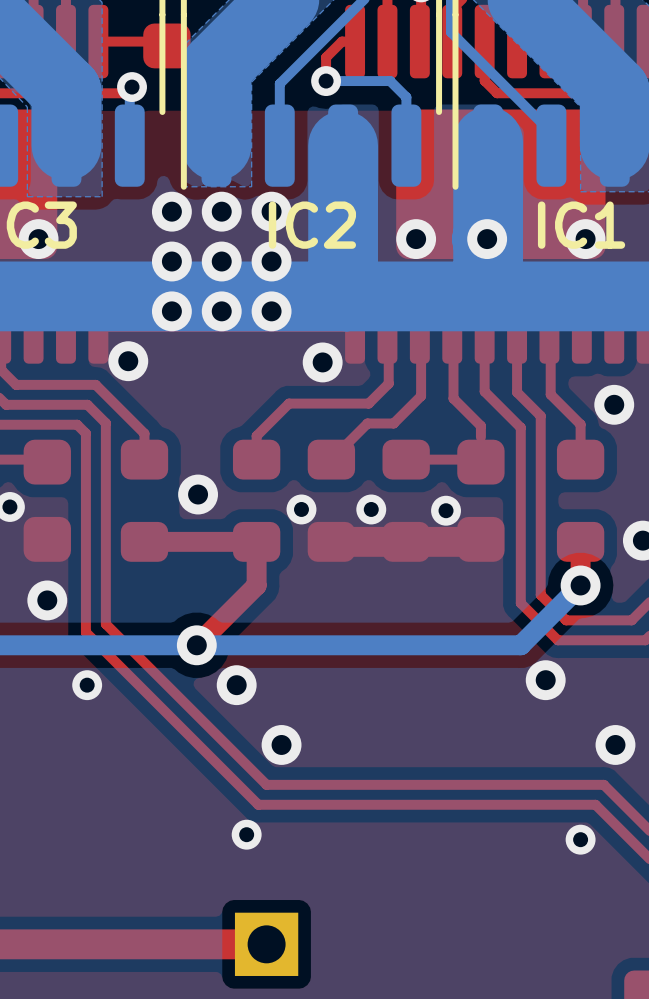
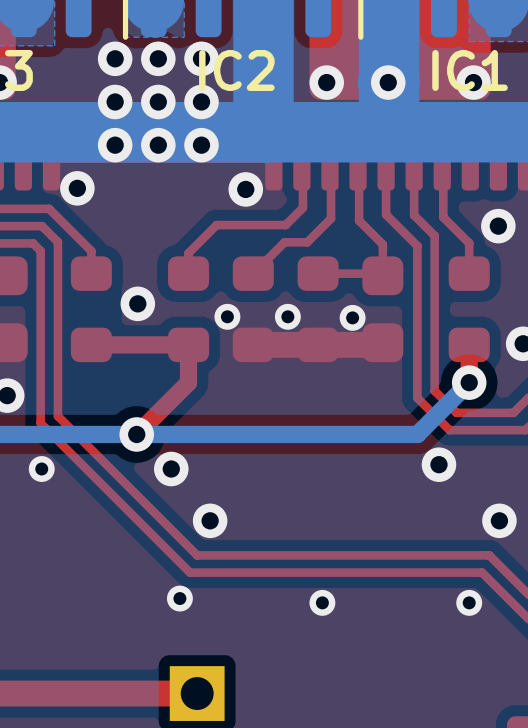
via: none -> (322, 602)

